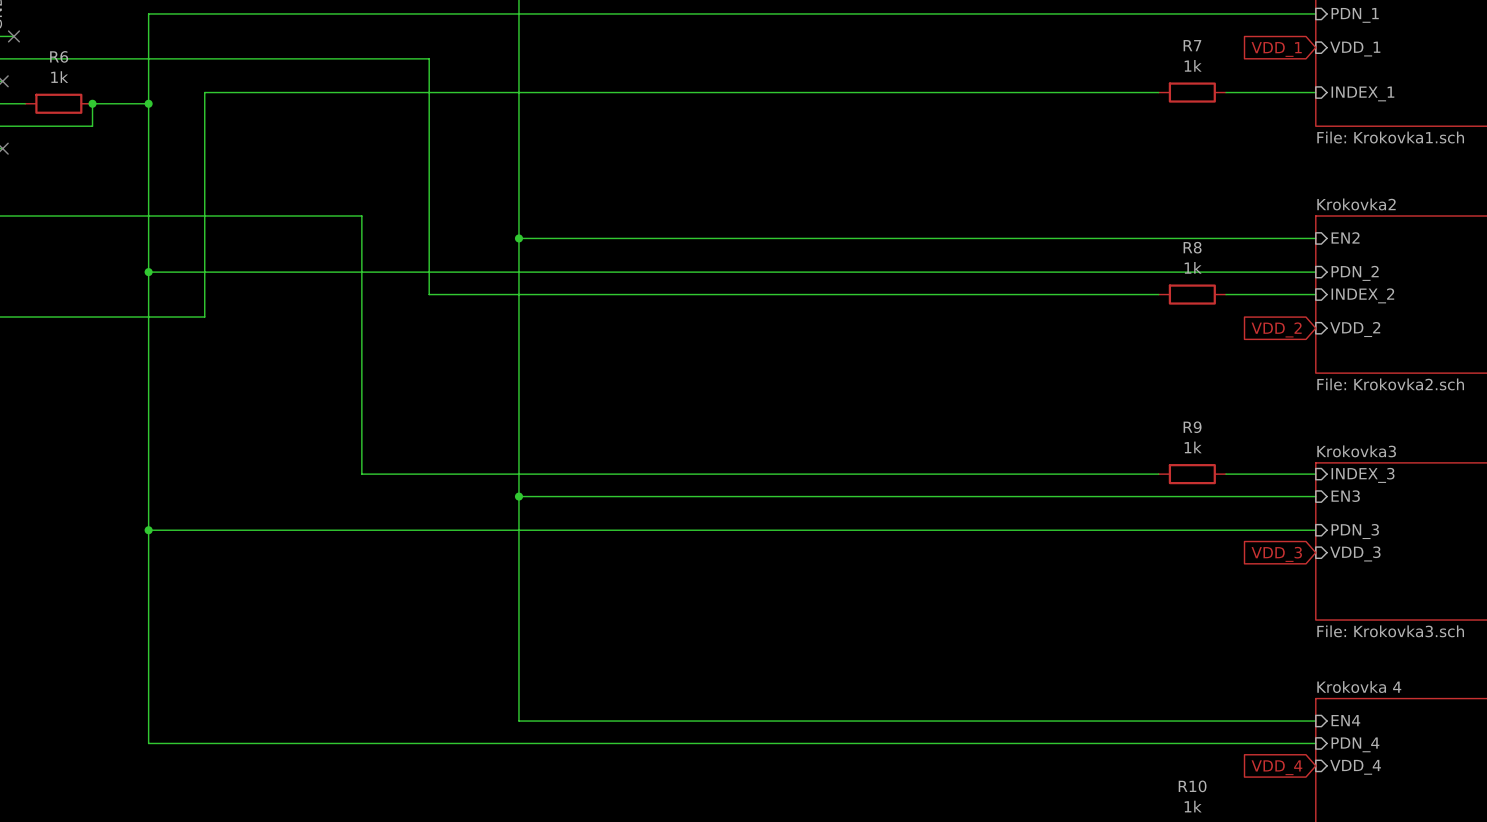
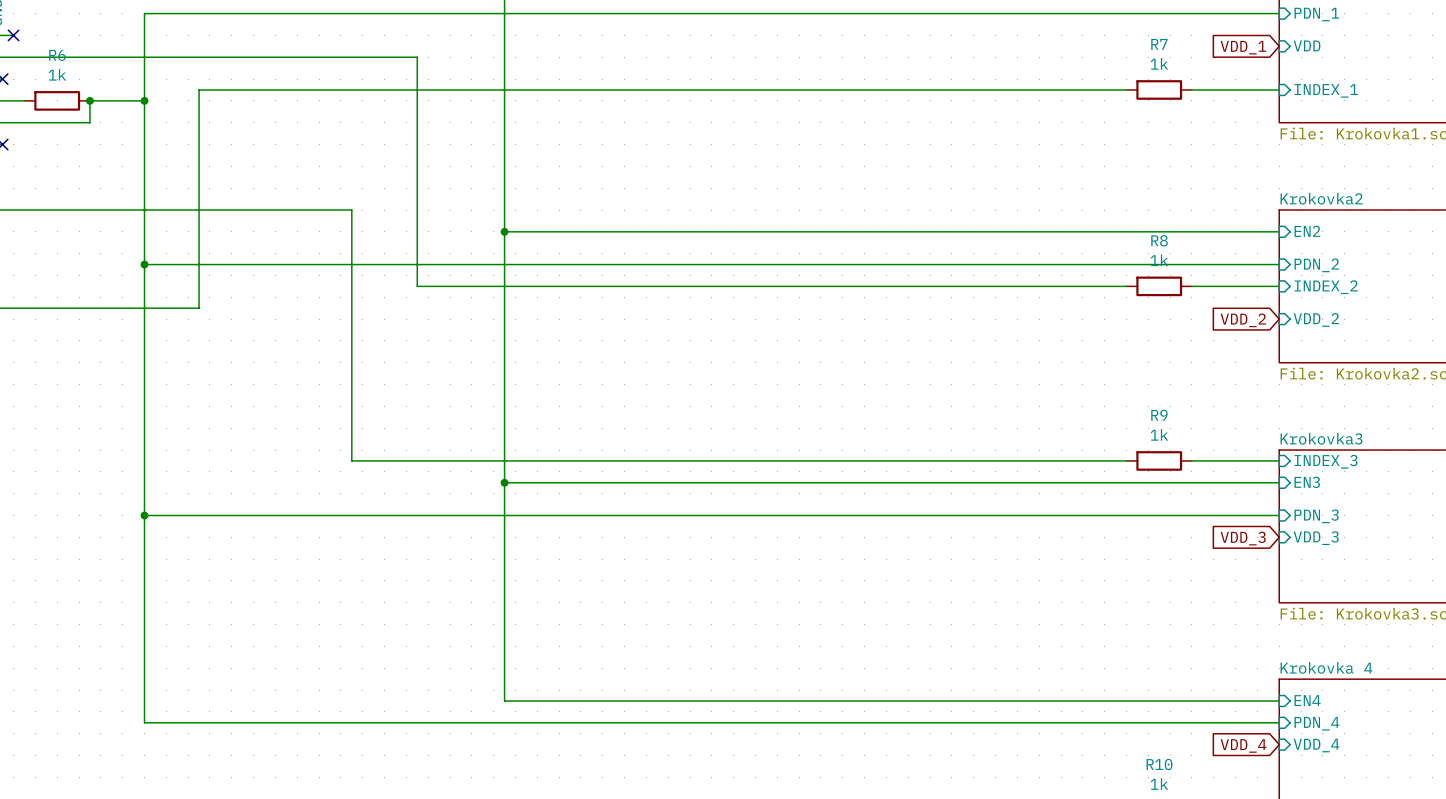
sheet pin: VDD_1 (1355, 49) -> VDD (1307, 45)

